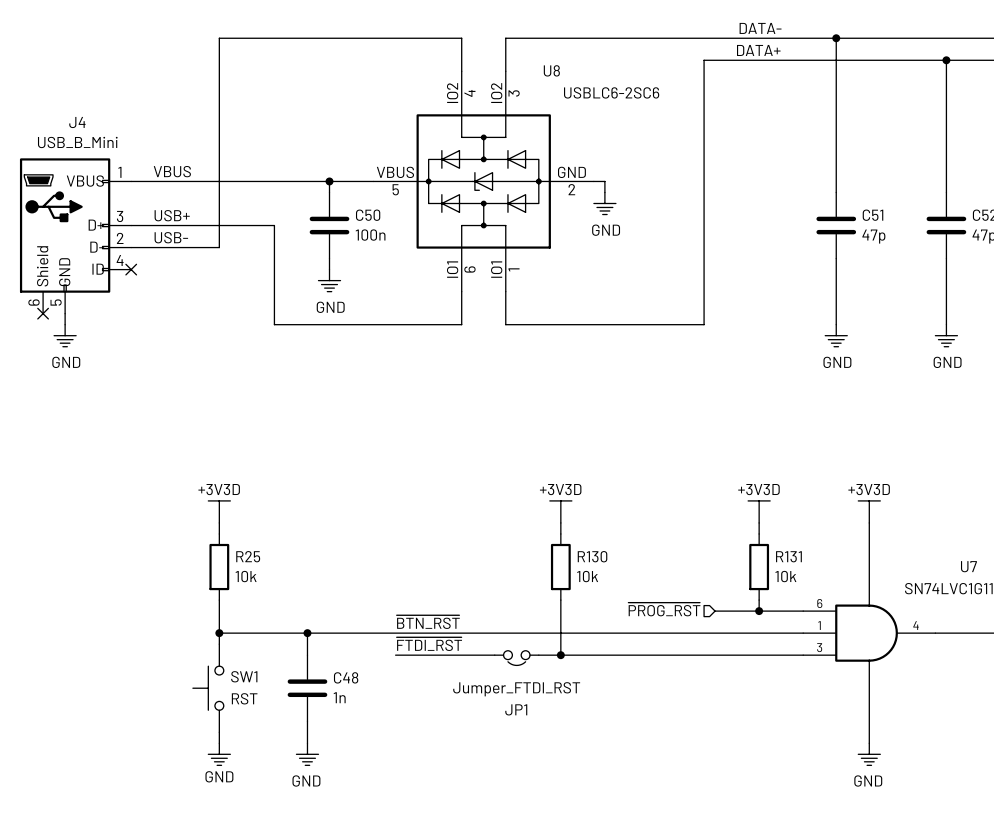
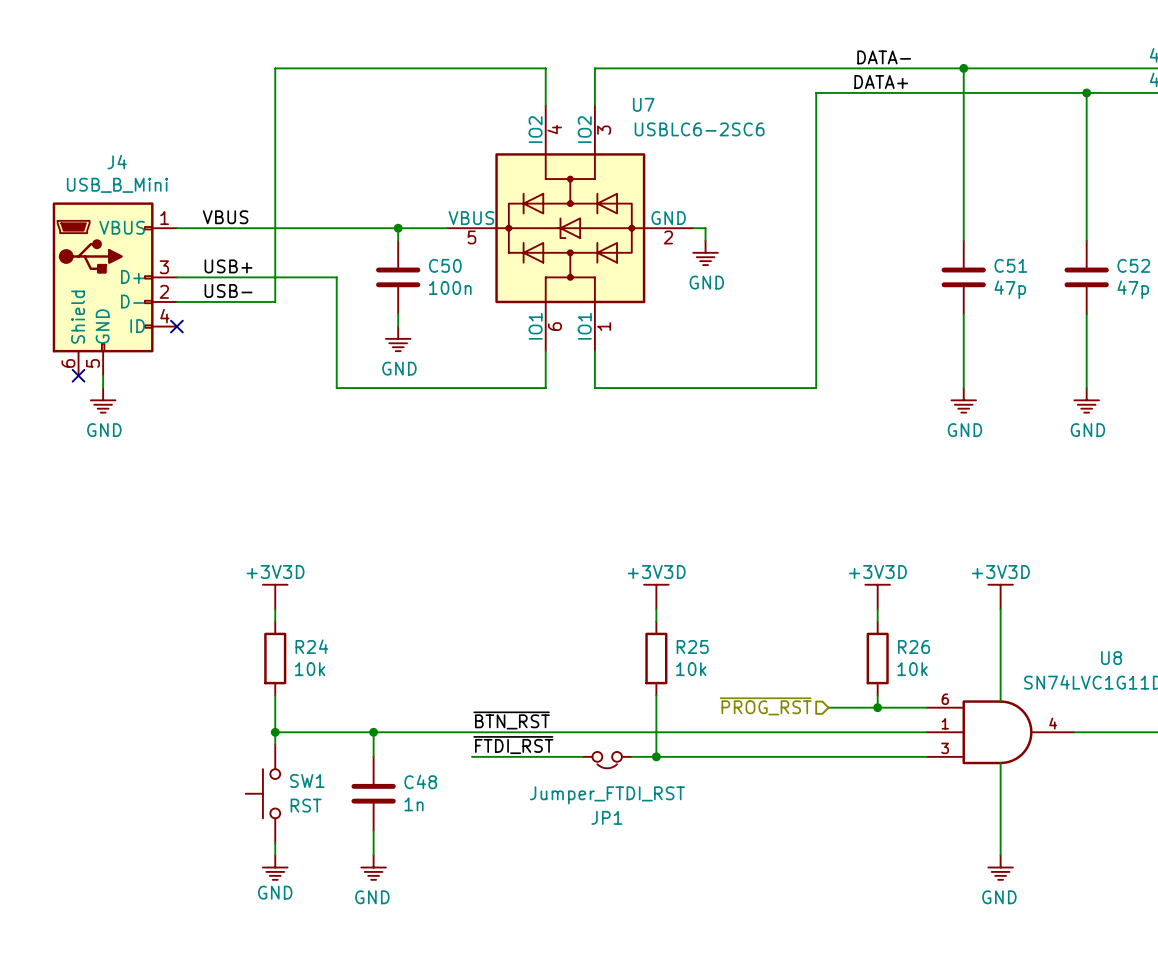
U8 name: U8 (551, 70) -> U7 (643, 104)
R25 name: R25 (248, 556) -> R24 (311, 646)
R130 name: R130 (592, 556) -> R25 (692, 646)
R131 name: R131 (788, 556) -> R26 (914, 646)
U7 name: U7 (968, 566) -> U8 (1111, 658)

